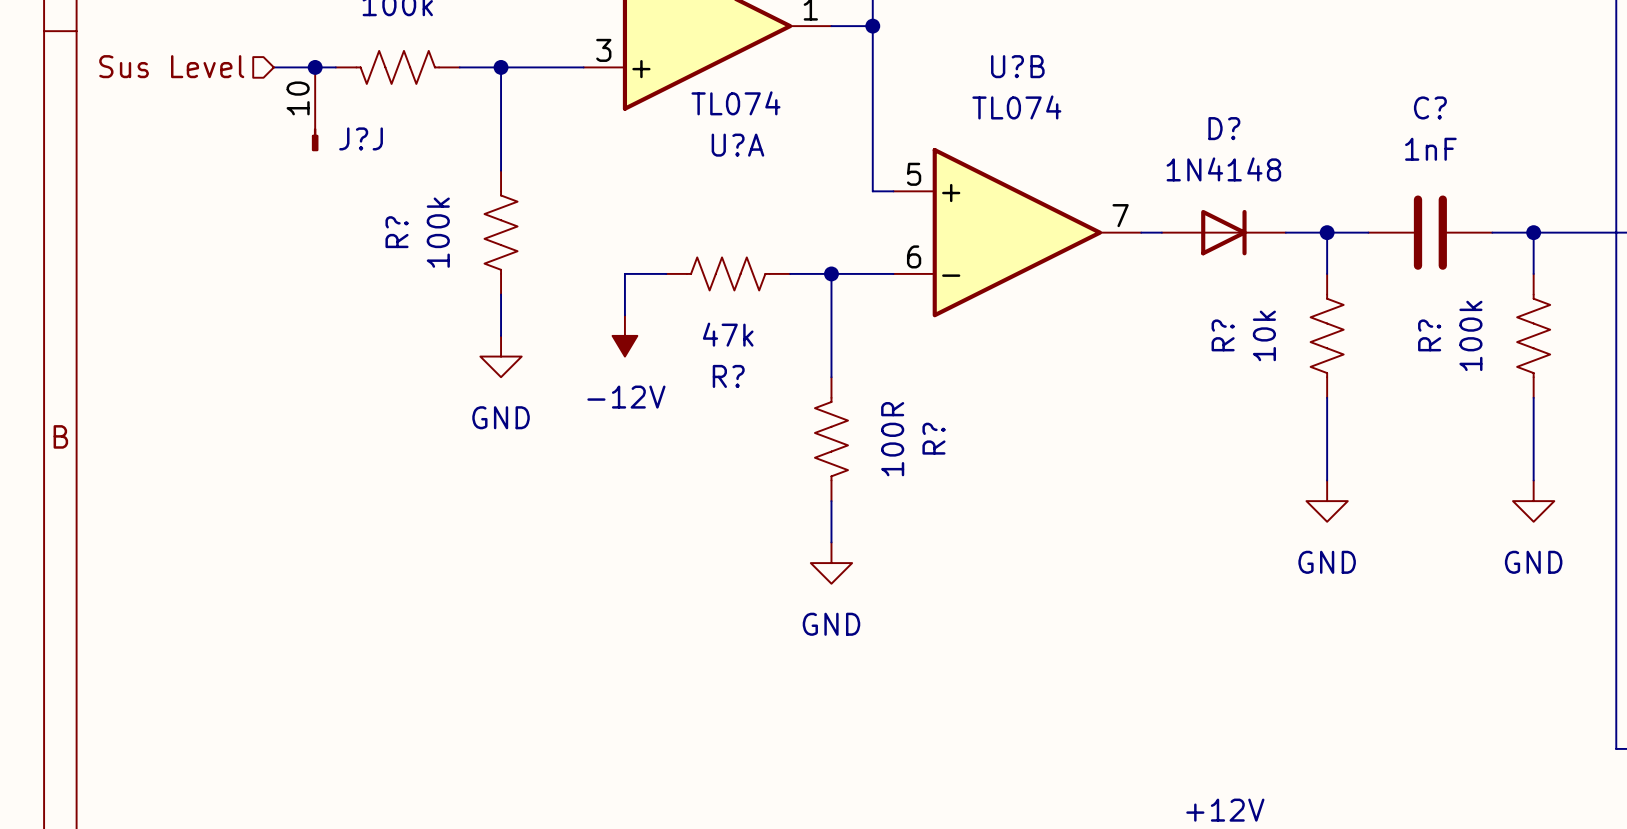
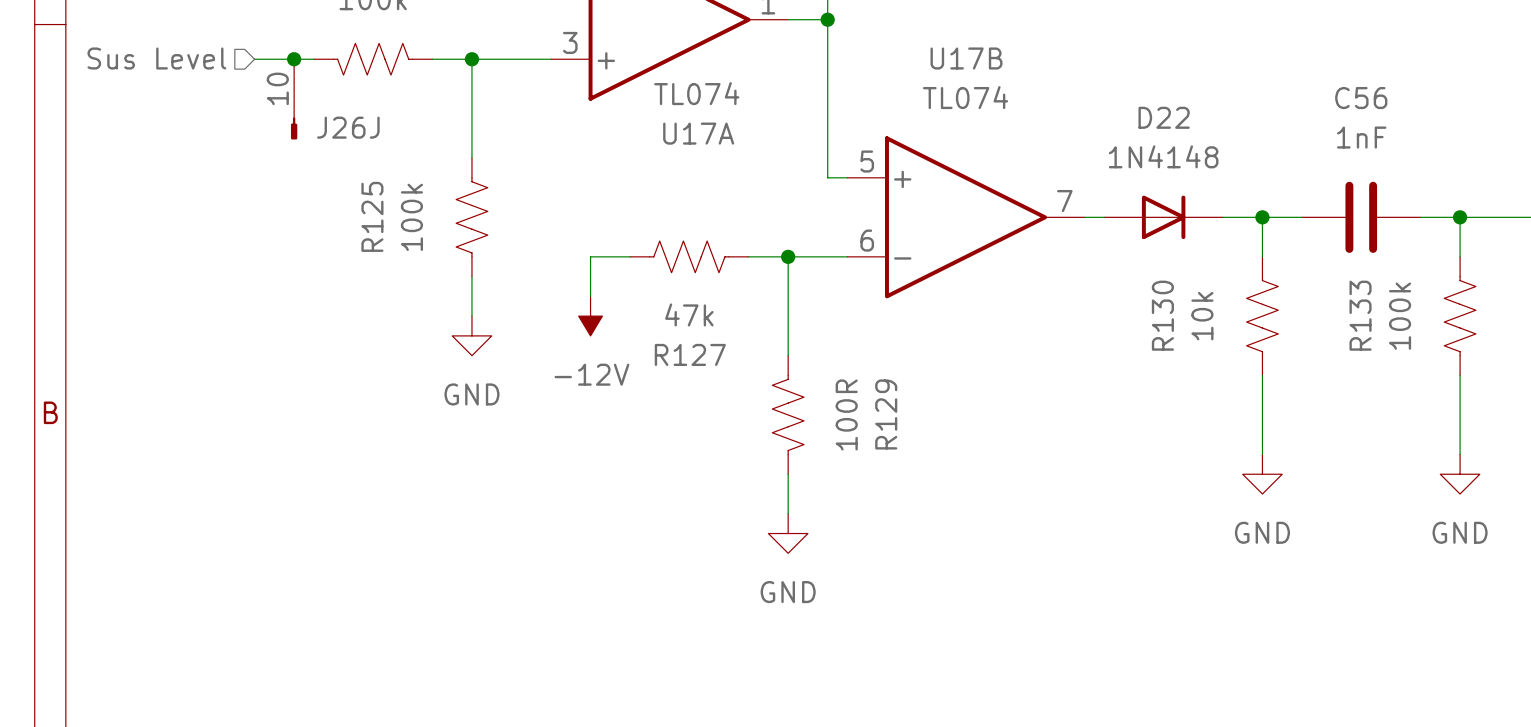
U?B name: U?B (1017, 66) -> U17B (966, 58)
C? name: C? (1430, 107) -> C56 (1361, 98)
D? name: D? (1224, 128) -> D22 (1164, 117)
J?J name: J?J (361, 138) -> J26J (348, 127)
U?A name: U?A (737, 145) -> U17A (698, 133)
R? name: R? (397, 232) -> R125 (372, 216)
R? name: R? (1223, 335) -> R130 (1162, 315)
R? name: R? (1429, 335) -> R133 (1360, 315)
R? name: R? (728, 376) -> R127 (690, 354)
R? name: R? (933, 438) -> R129 (886, 414)

